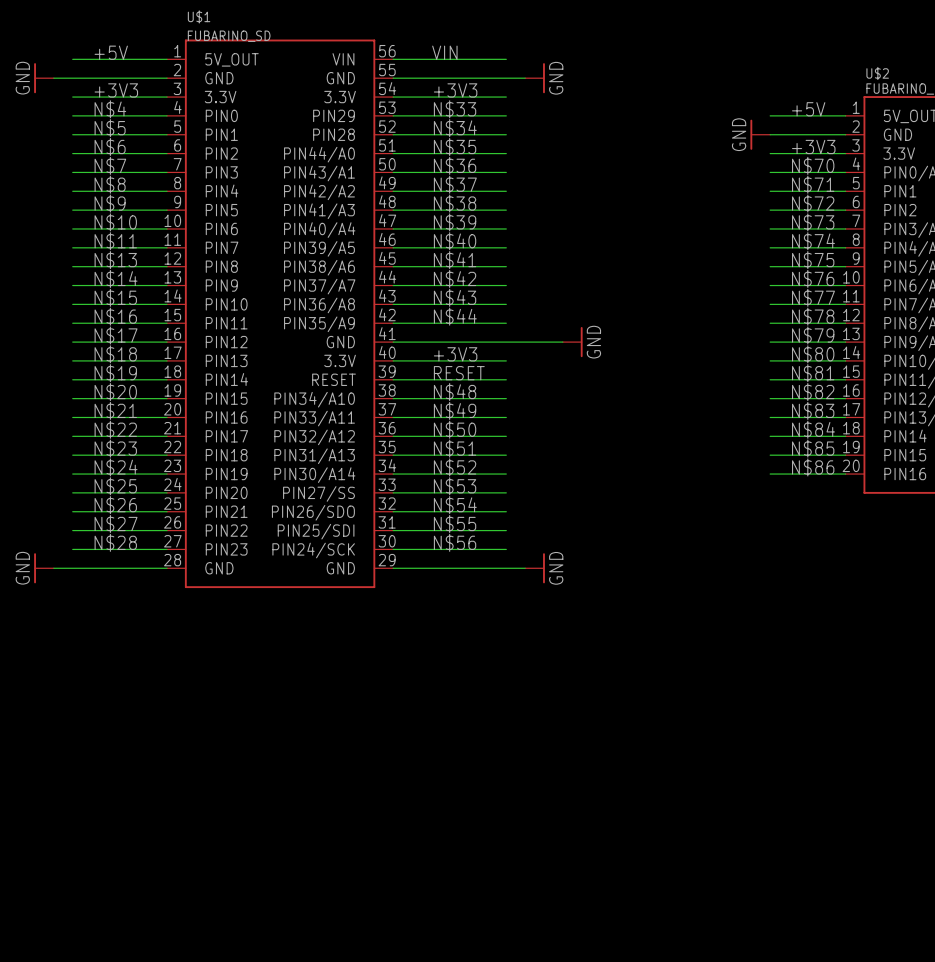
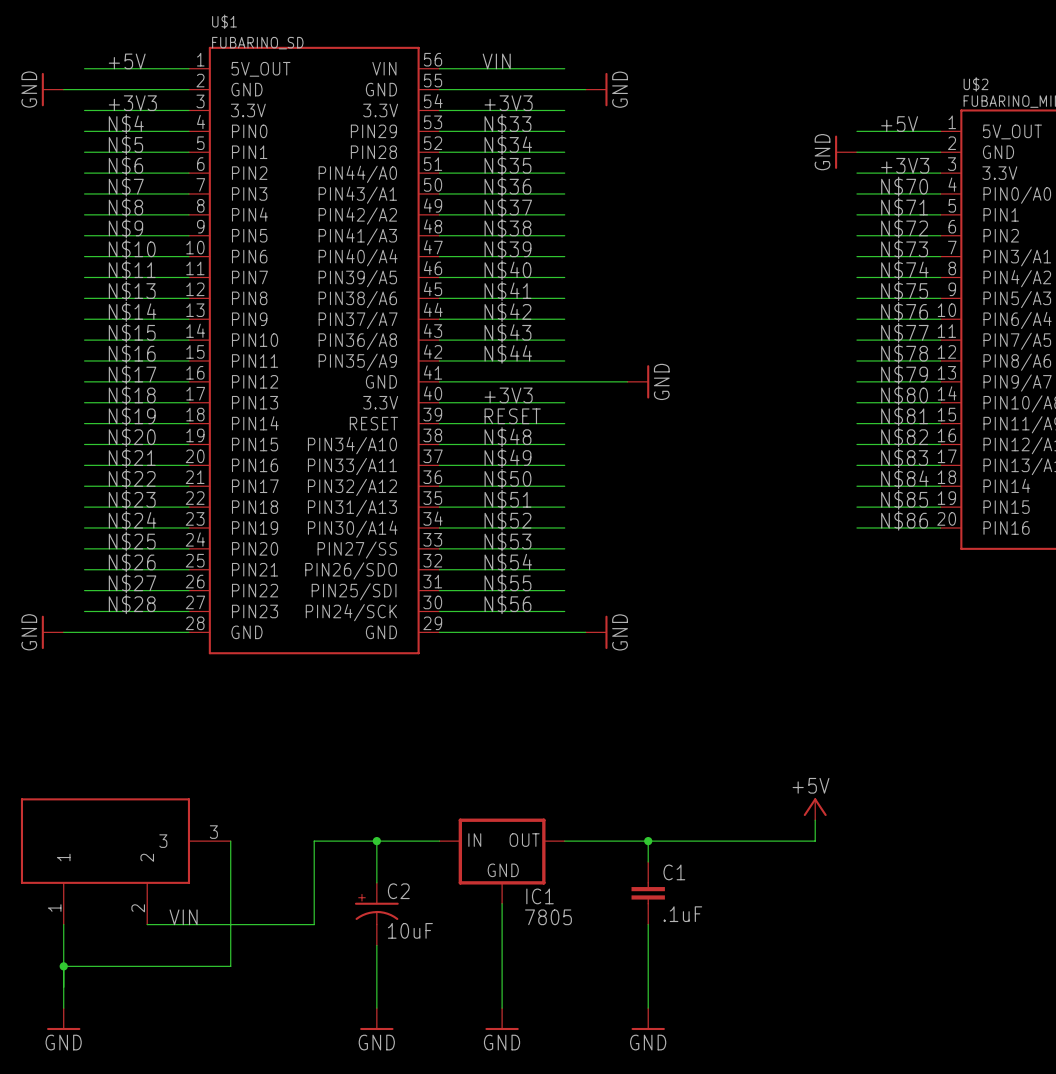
power symbol: none -> +5V (815, 809)
wire: none -> (815, 820) (815, 841) (564, 841)
wire: none -> (230, 841) (230, 966) (63, 966)
wire: none -> (376, 841) (376, 882)
junction: none -> (376, 841)
wire: none -> (439, 841) (314, 841) (314, 924) (147, 924)
wire: none -> (648, 841) (648, 861)
junction: none -> (648, 841)
IC1: none -> 7805 (502, 861)
part: none -> (125, 861)
C1: none -> .1uF (648, 893)
wire: none -> (502, 903) (502, 1008)
C2: none -> 10uF (376, 914)
label: none -> VIN (183, 917)
wire: none -> (63, 924) (63, 1008)
wire: none -> (648, 924) (648, 1008)
wire: none -> (376, 945) (376, 1008)
junction: none -> (63, 966)
power symbol: none -> GND (63, 1019)
power symbol: none -> GND (376, 1019)
power symbol: none -> GND (502, 1019)
power symbol: none -> GND (648, 1019)

